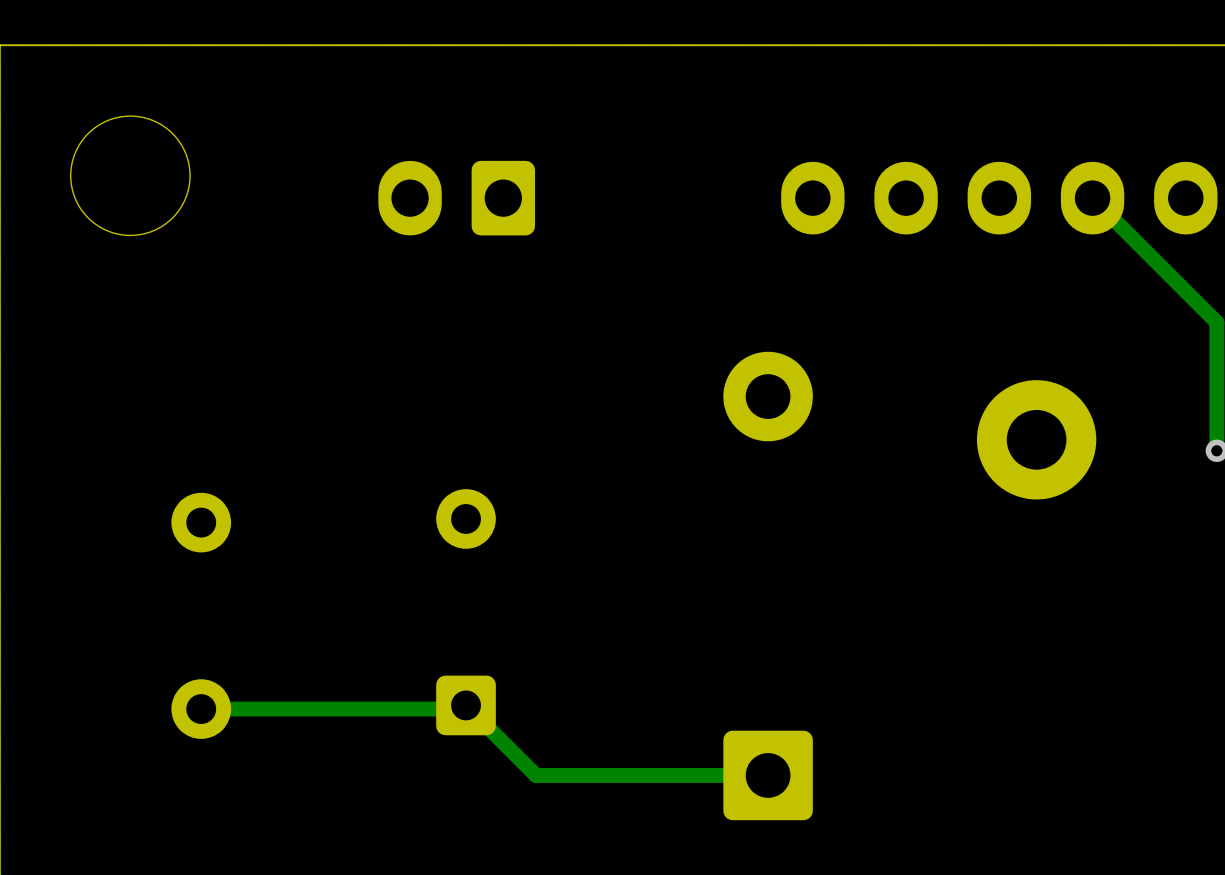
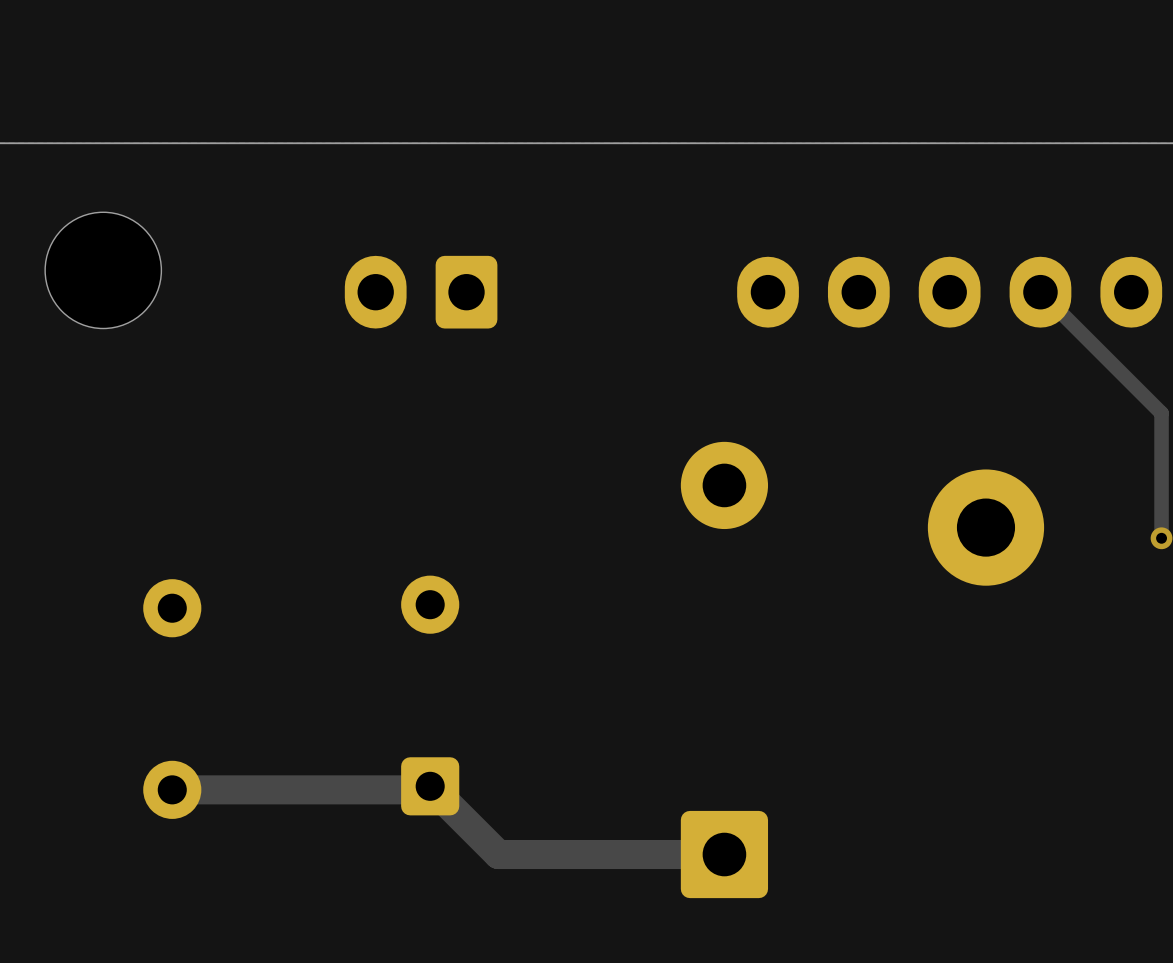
track width: thin (466, 705) (536, 775) (768, 775) -> thick (430, 786) (498, 854) (724, 854)
track width: thin (462, 709) (201, 709) -> thick (426, 789) (172, 789)

